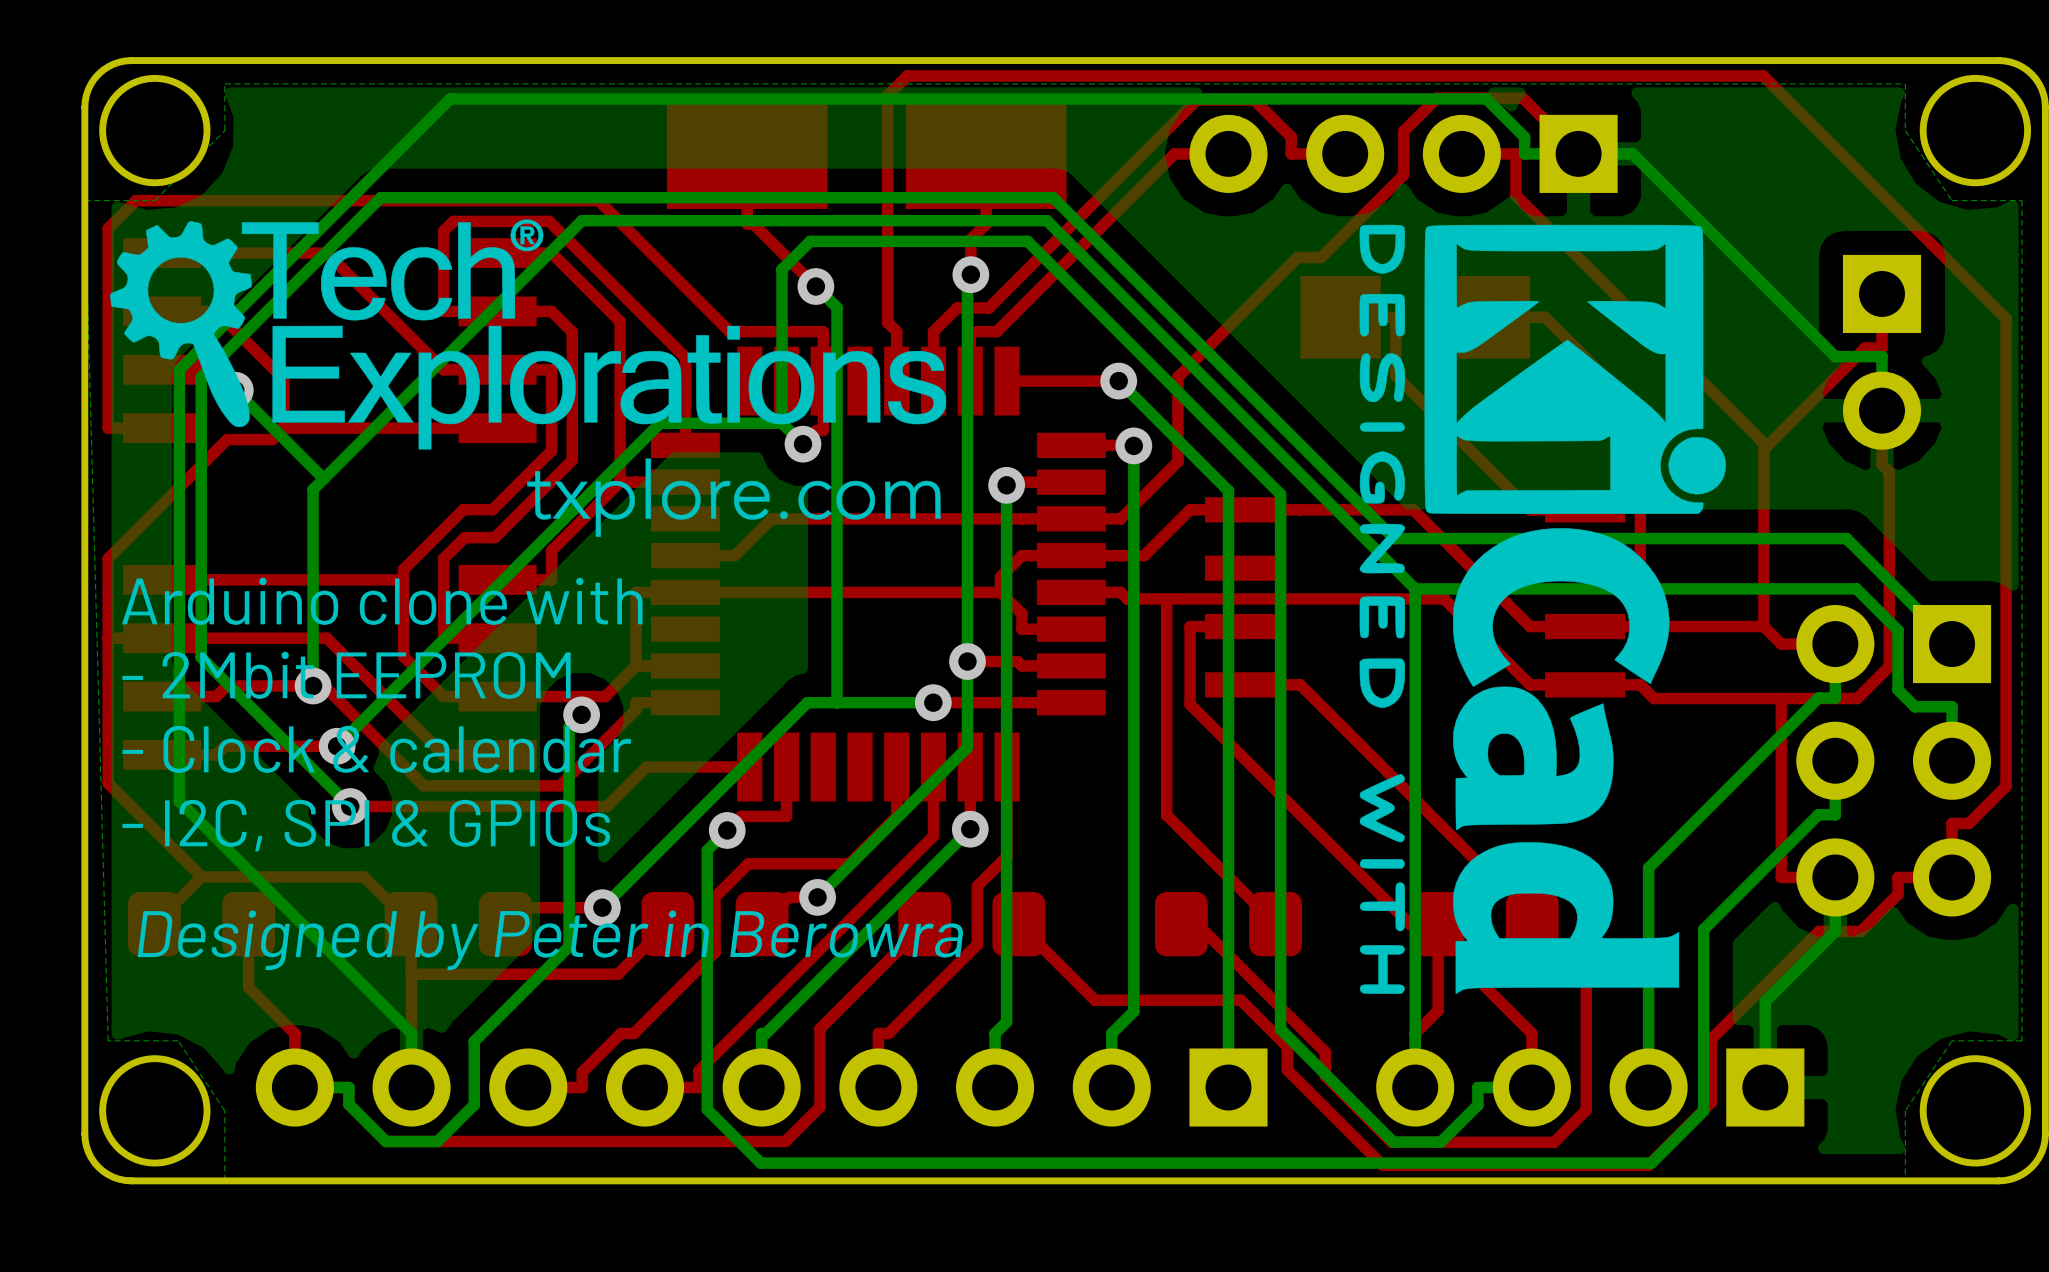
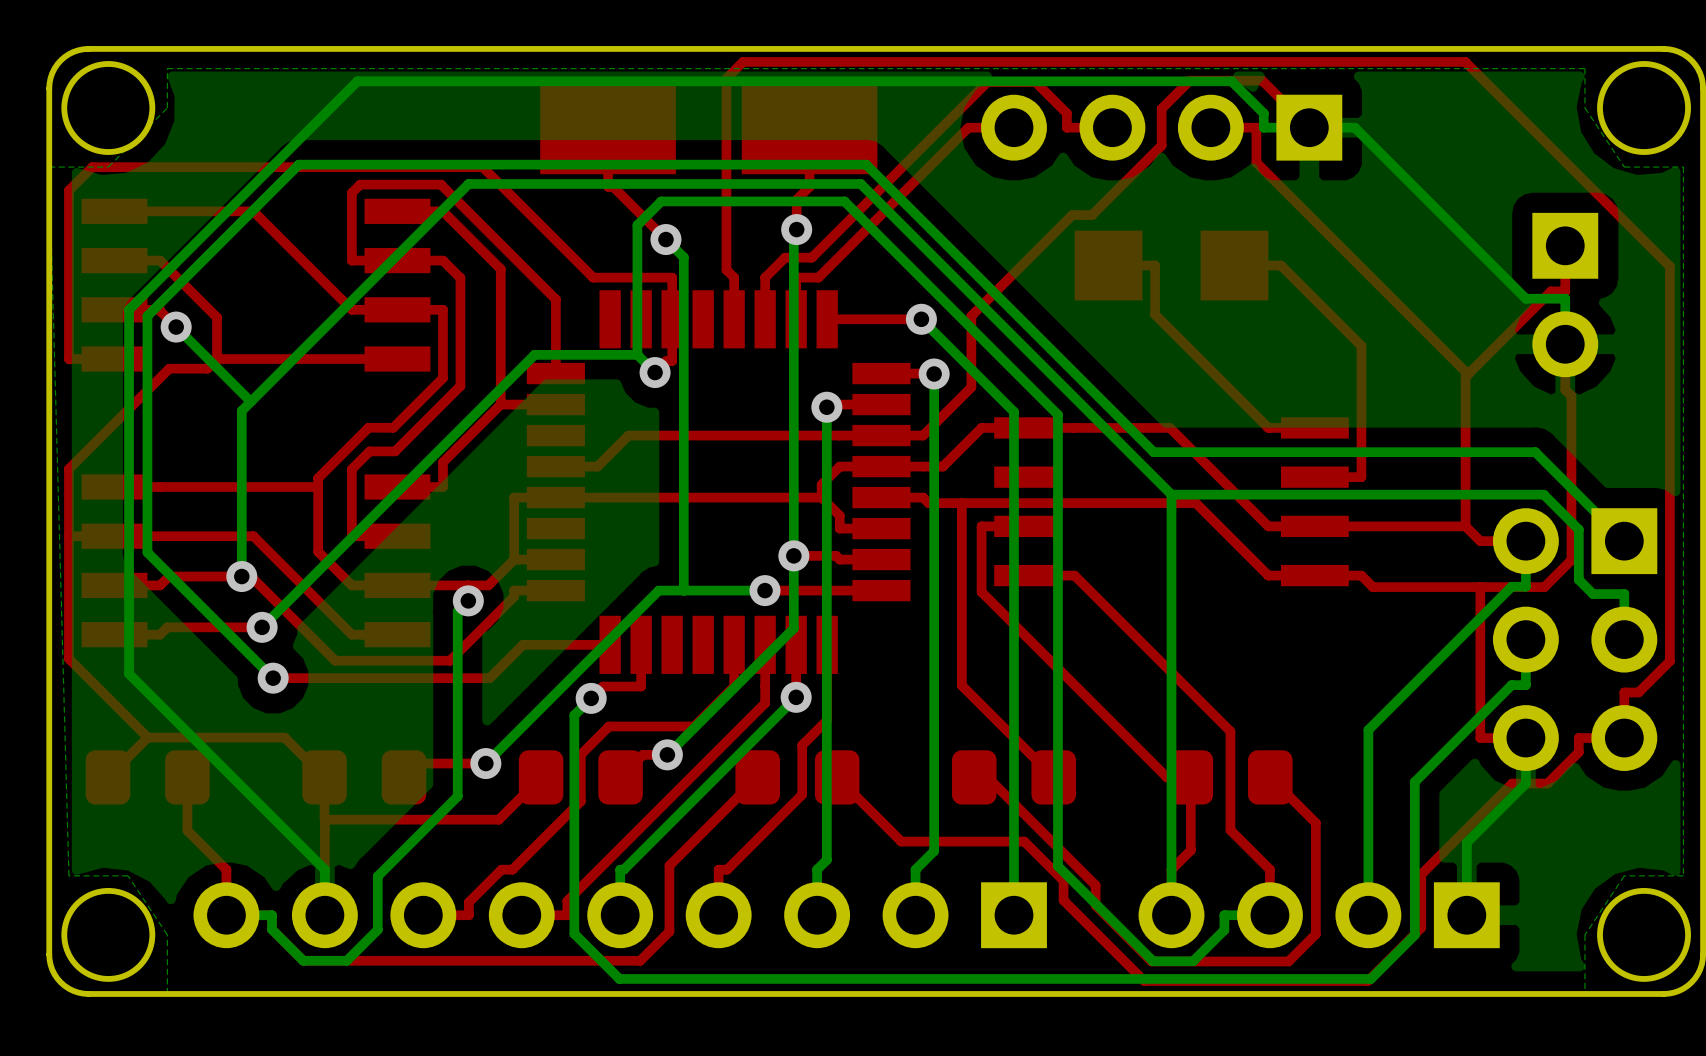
drawing: [110, 219, 947, 537] -> none
drawing: [1359, 224, 1726, 994] -> none
text: Arduino clone with (382, 601) -> none
text: - 2Mbit EEPROM (346, 675) -> none
text: - Clock & calendar (376, 749) -> none
text: - I2C, SPI & GPIOs (366, 825) -> none
text: Designed by Peter in Berowra (550, 940) -> none

